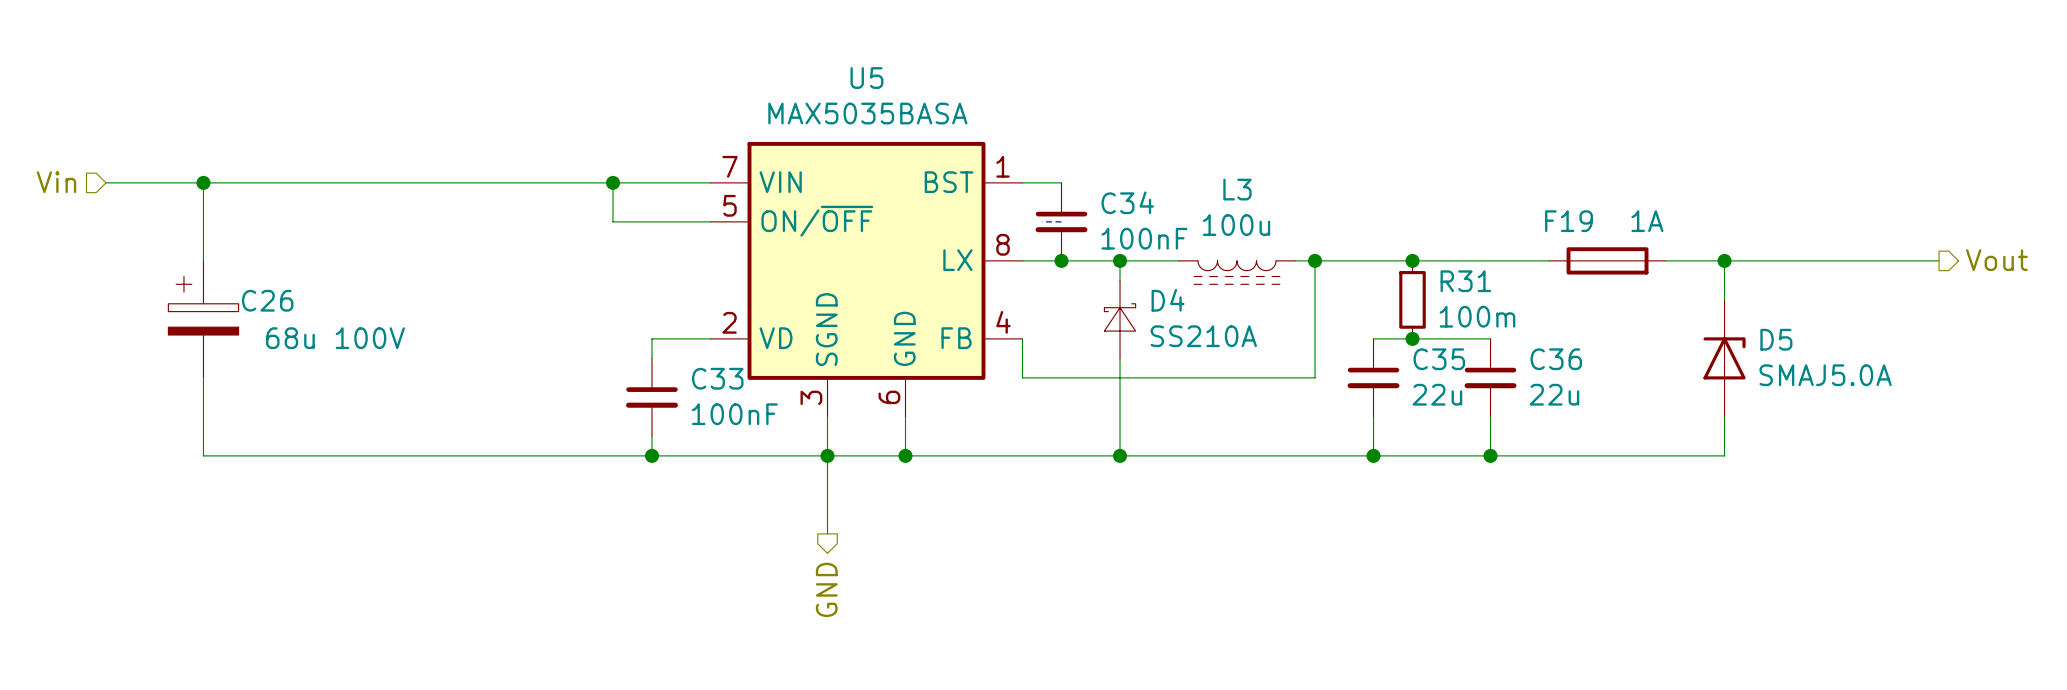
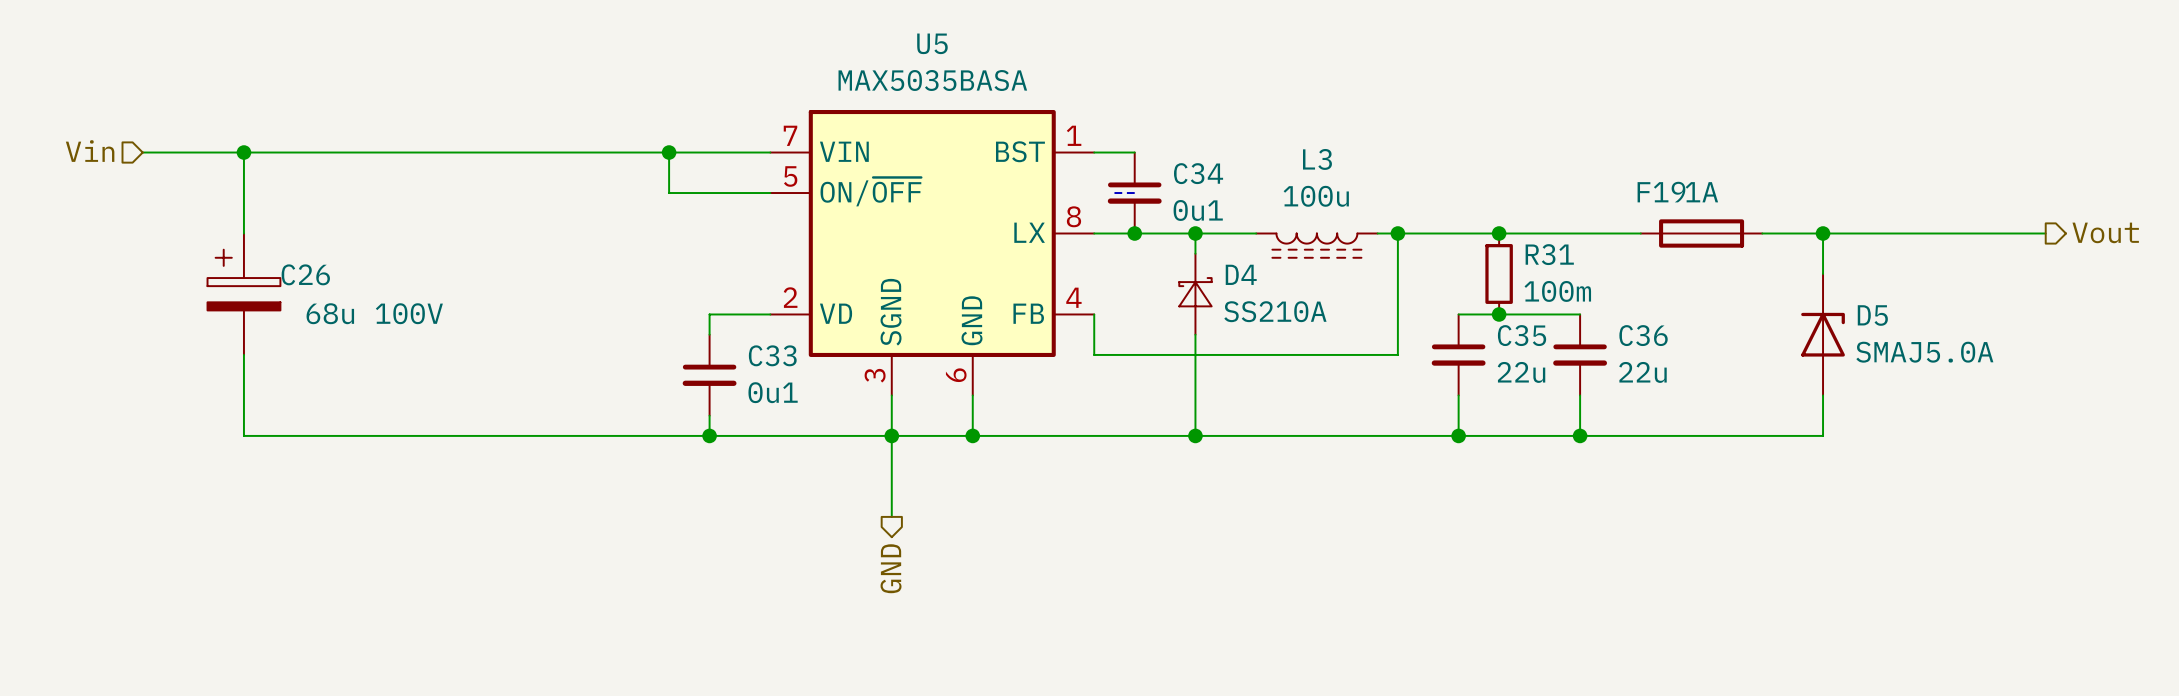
F19 value position: 1A (1647, 221) -> 1A (1701, 192)
C34 value: 100nF (1144, 238) -> 0u1 (1198, 210)
C33 value: 100nF (734, 414) -> 0u1 (773, 392)

